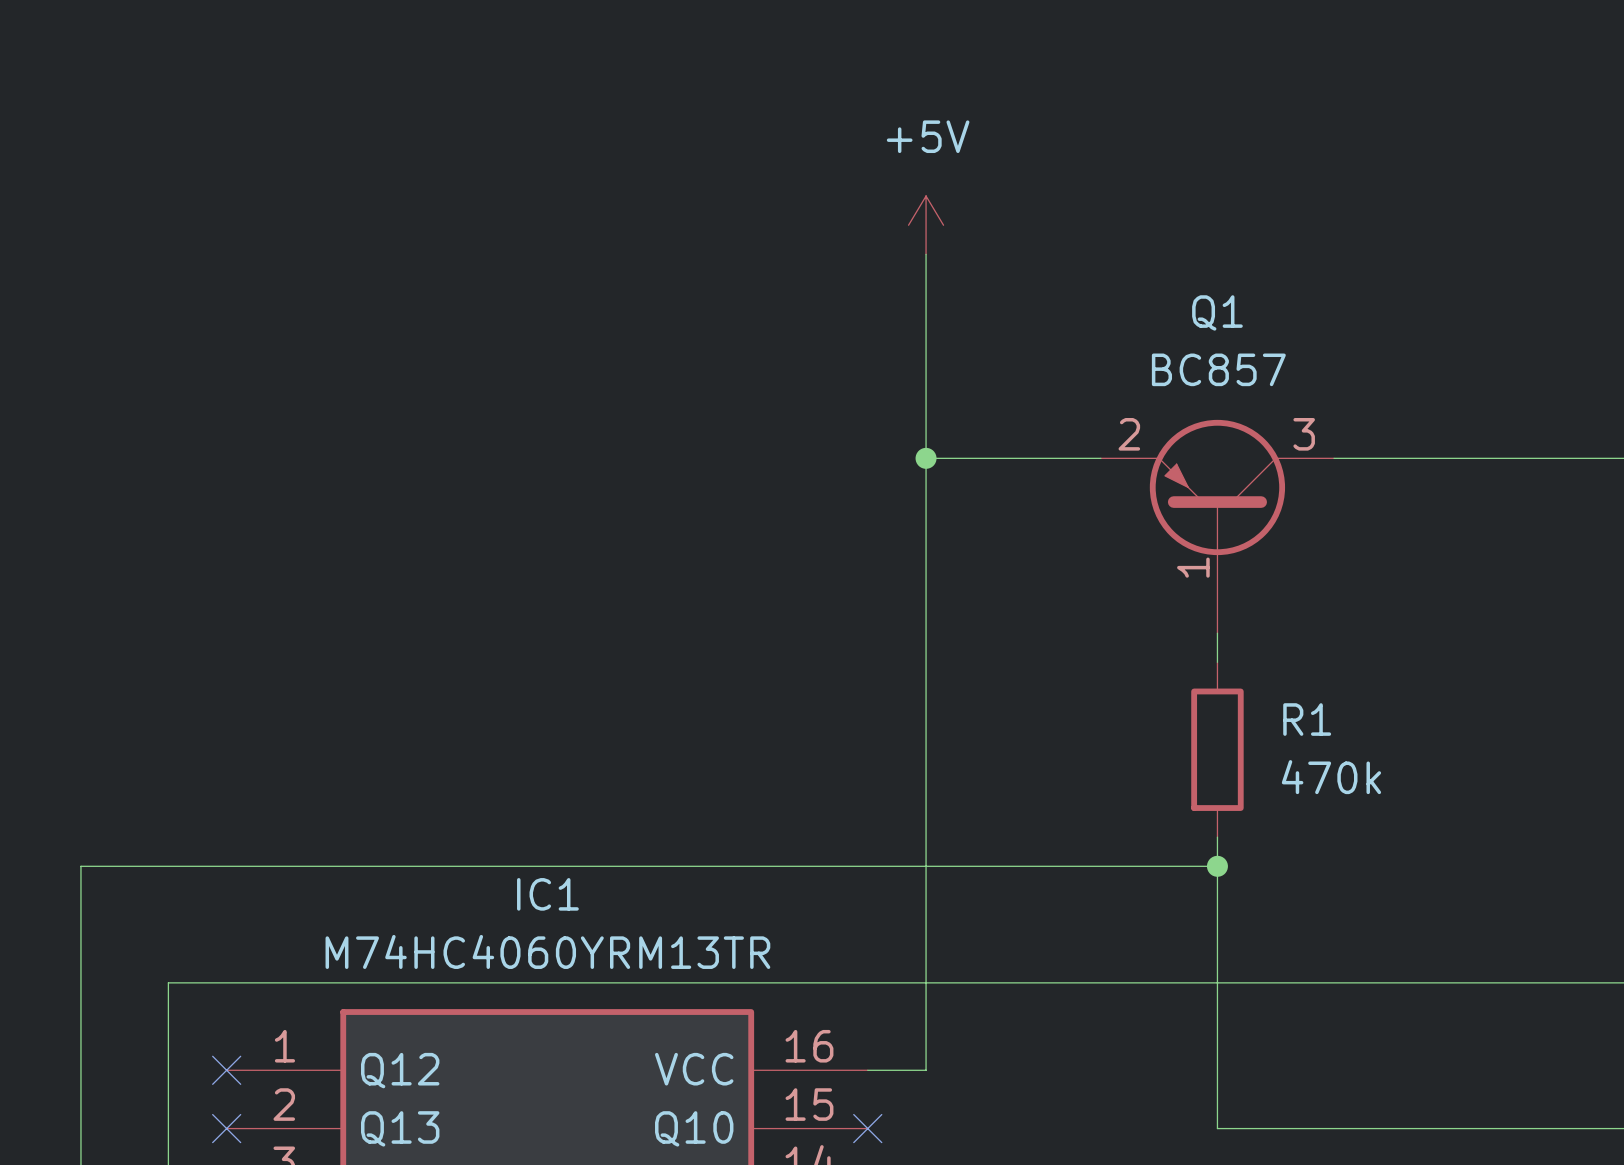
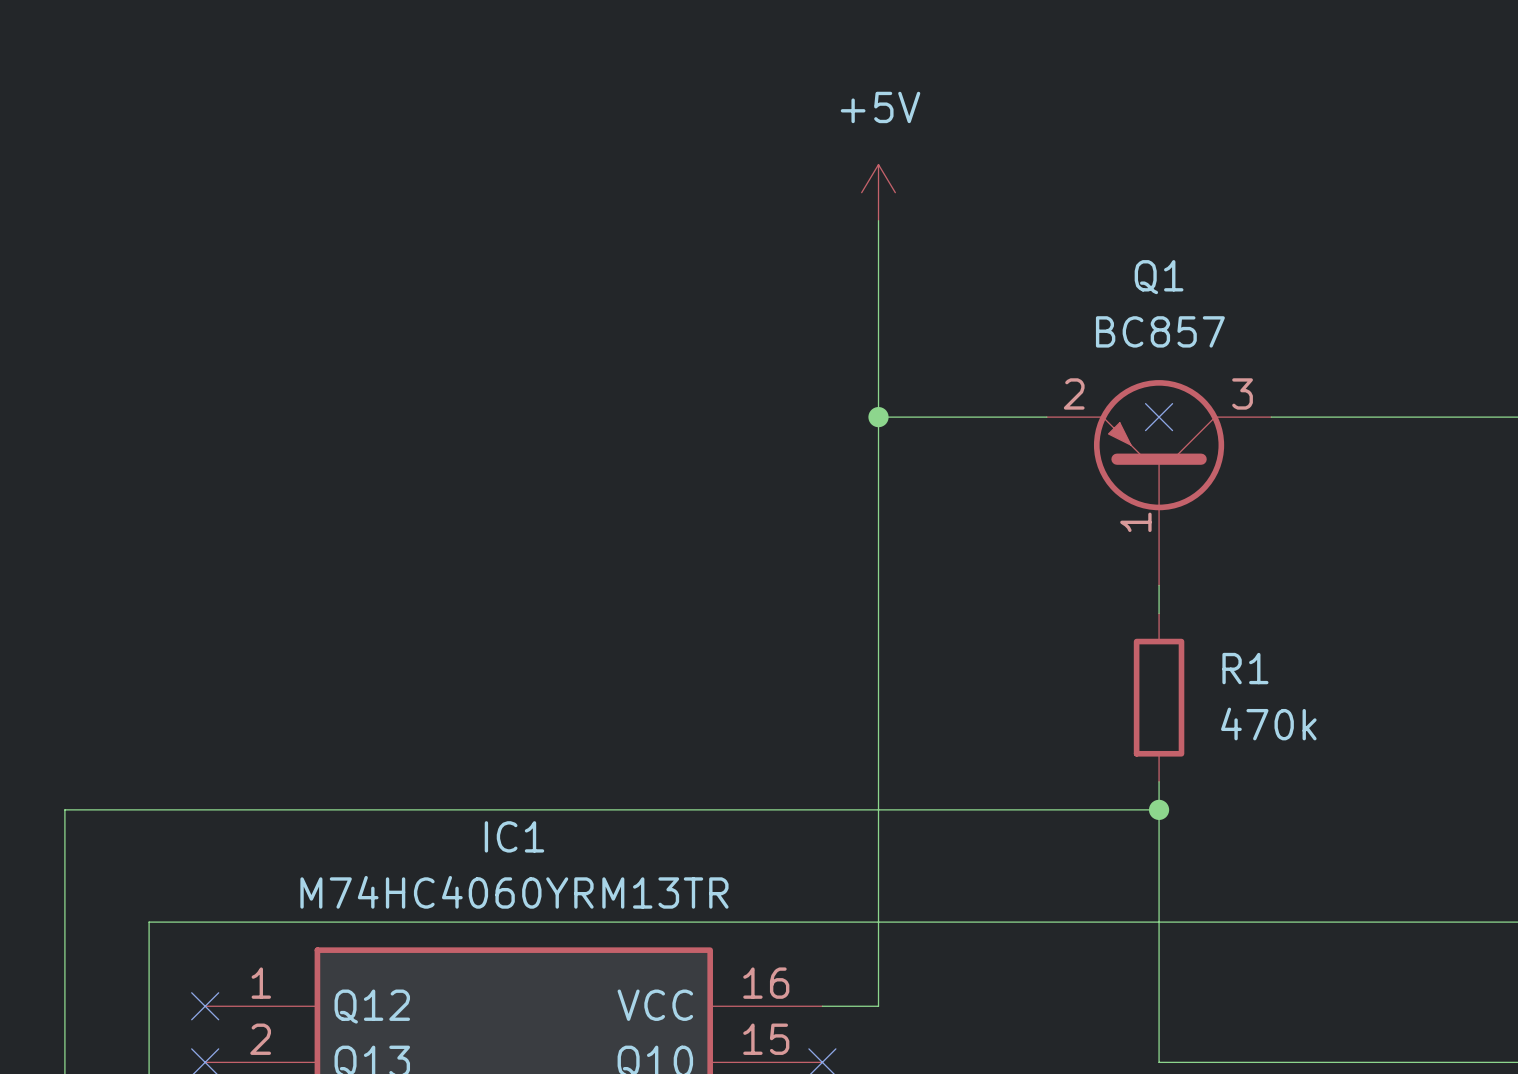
no-connect mark: none -> (1159, 417)

